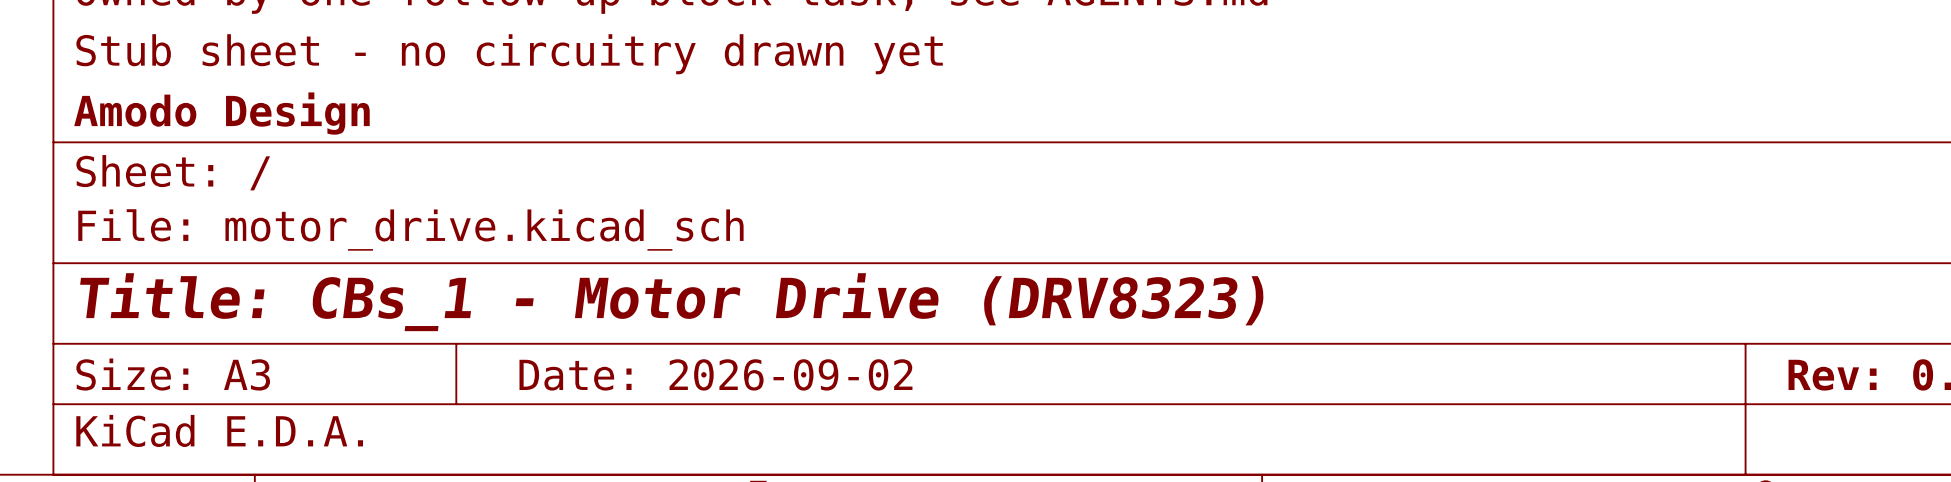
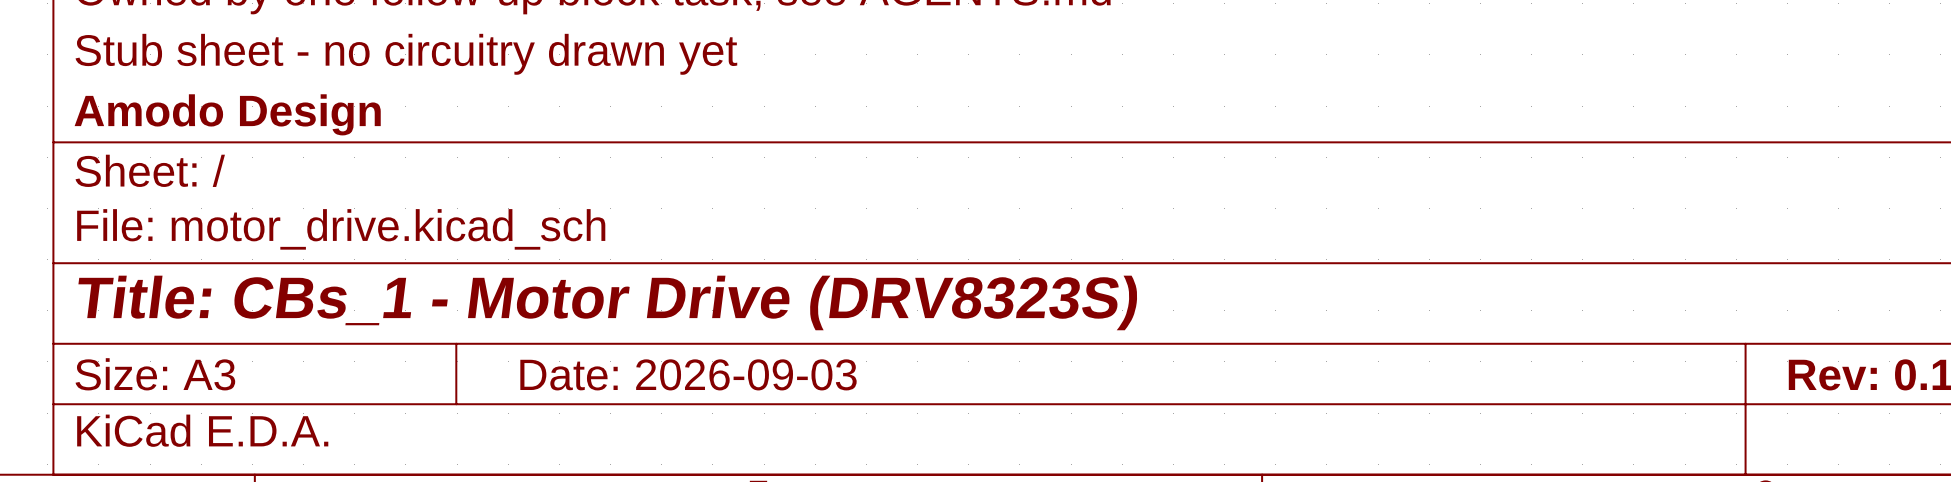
title block: Title: CBs_1 - Motor Drive (DRV8323) (672, 302) -> Title: CBs_1 - Motor Drive (DRV8323S) (608, 302)
title block: Date: 2026-09-02 (715, 374) -> Date: 2026-09-03 (688, 374)

